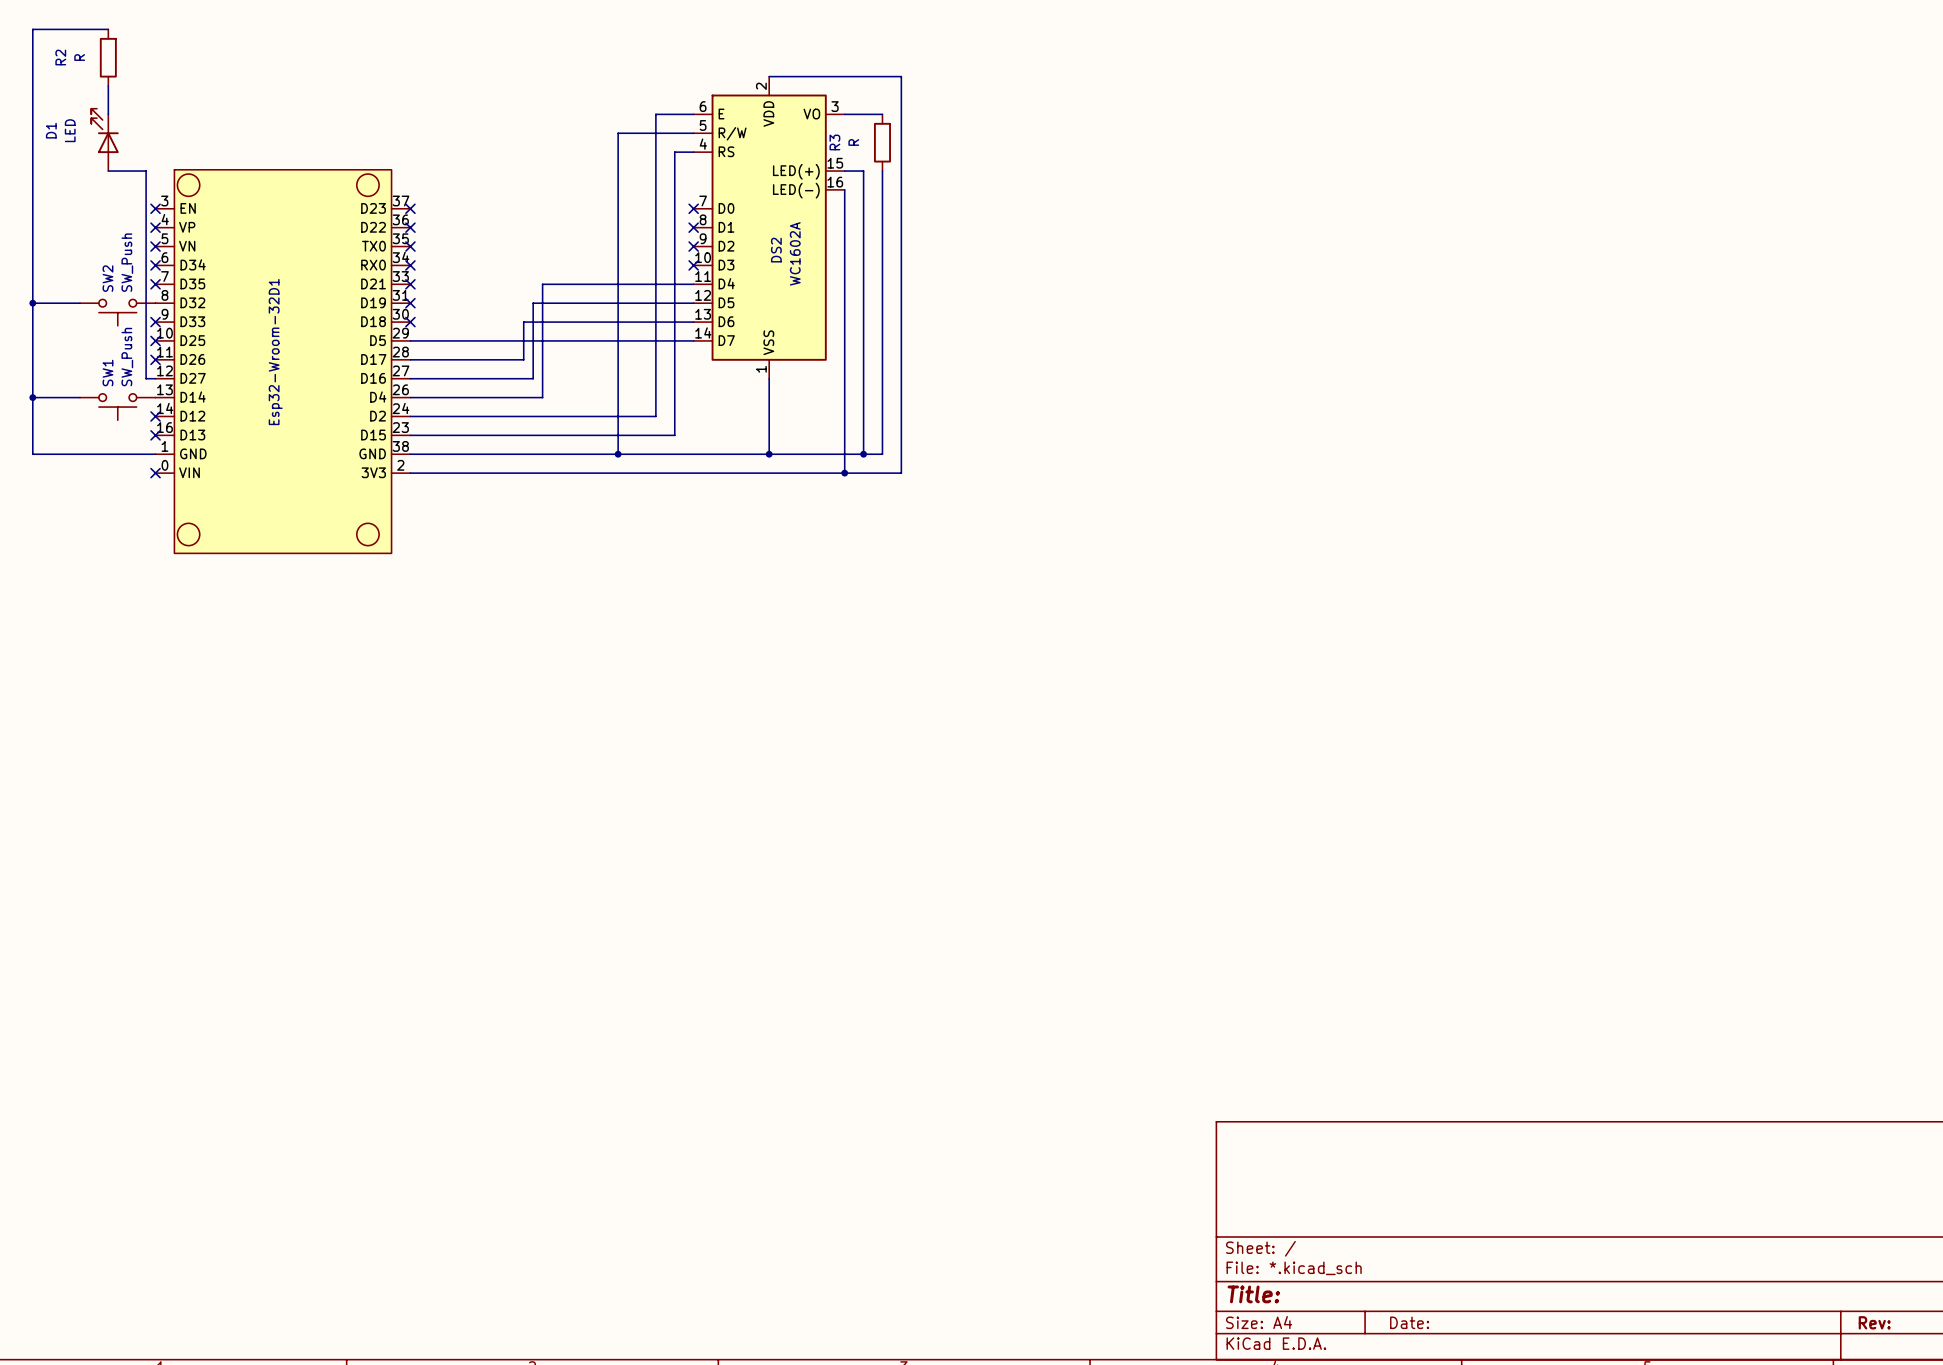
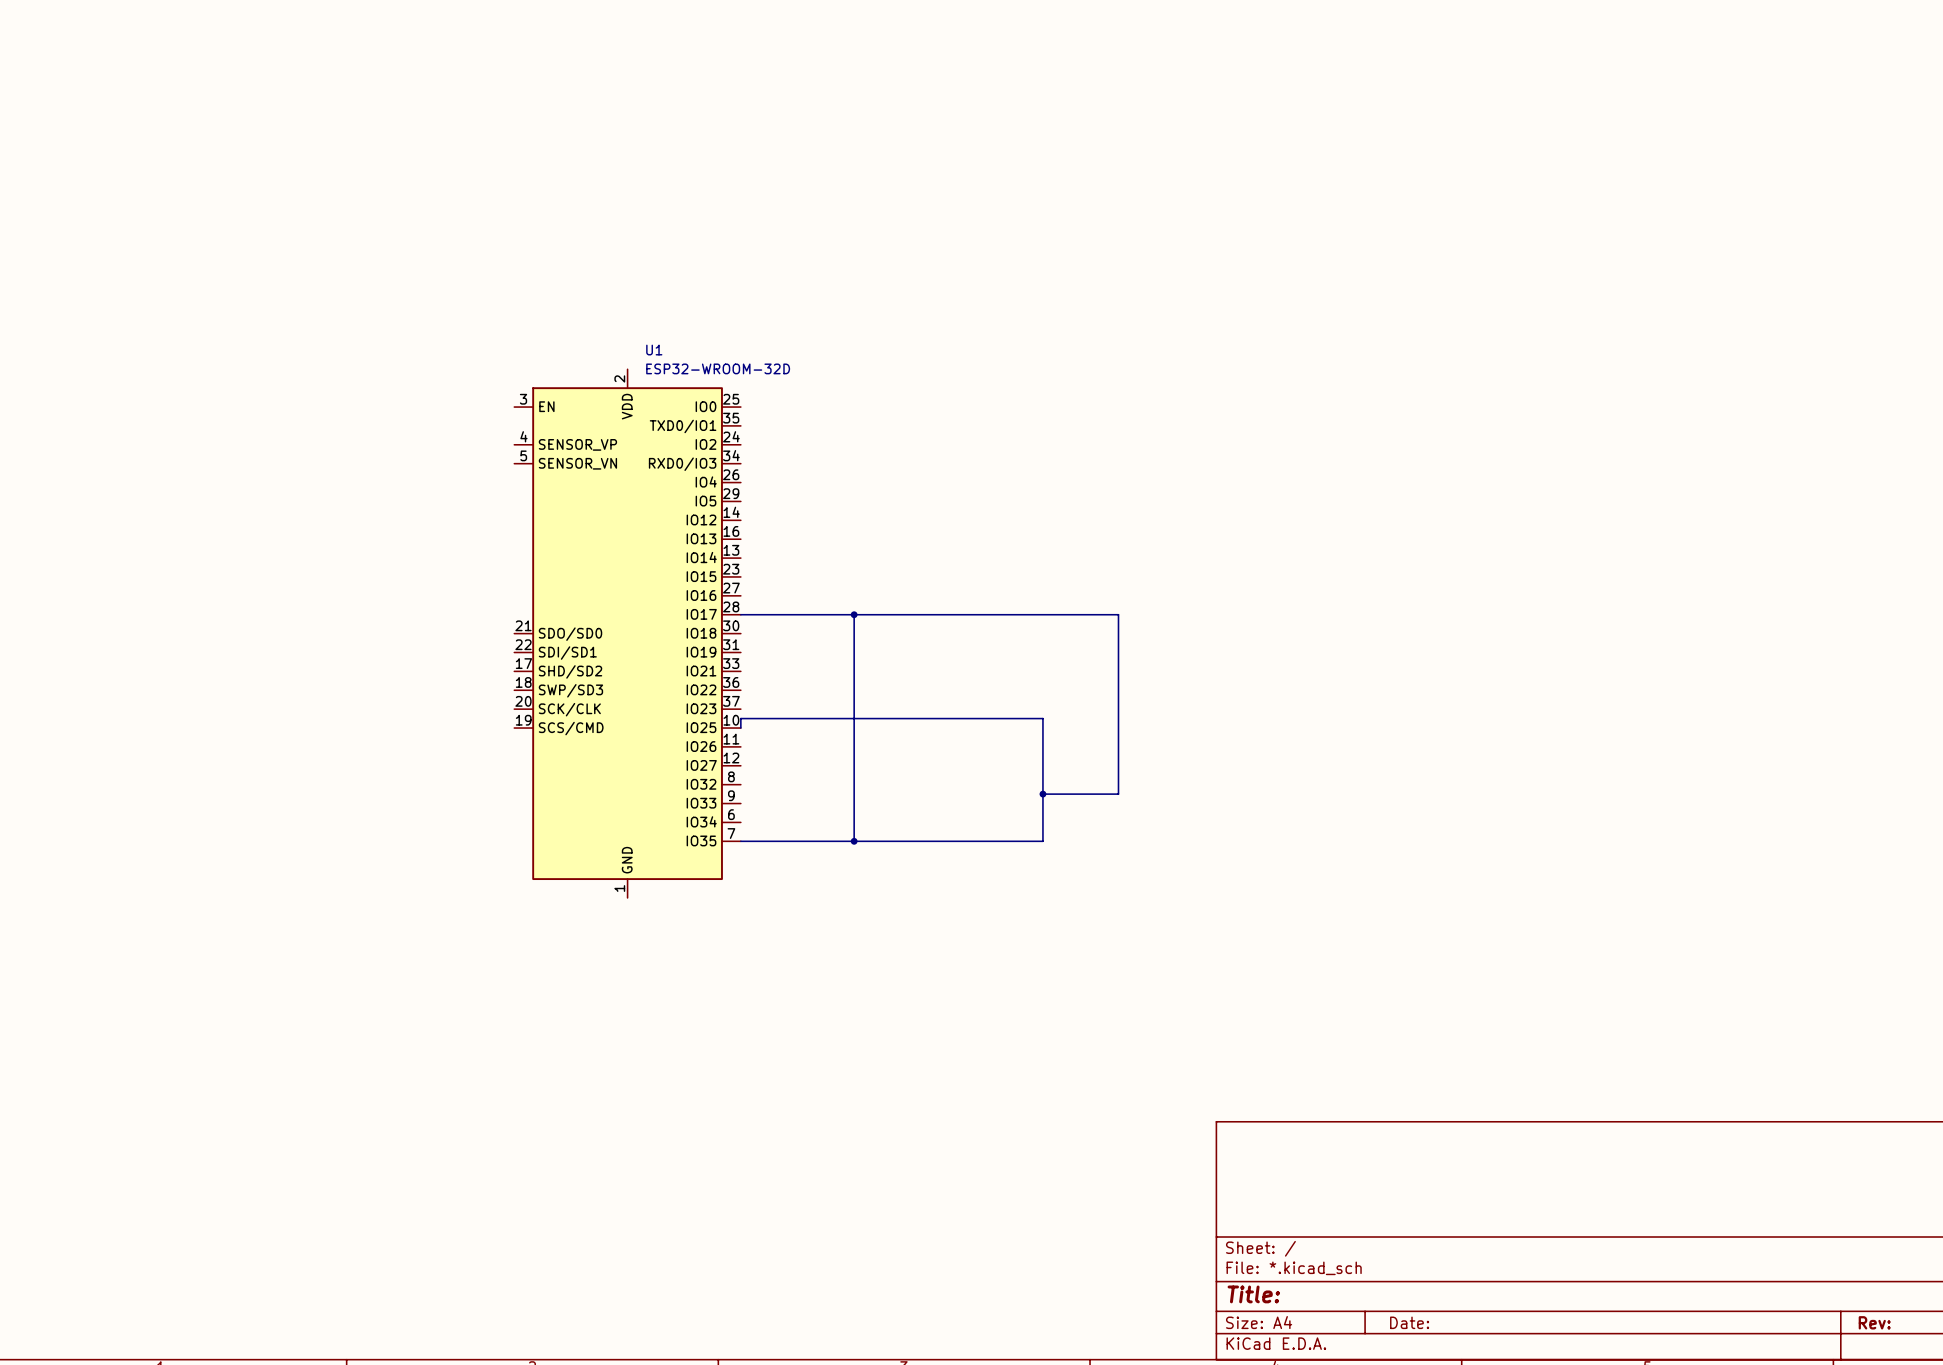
wire: (108, 29) (32, 29) (32, 454) (155, 454) -> none
R2: R (108, 57) -> none
wire: (769, 76) (901, 76) (901, 473) (410, 473) -> none
wire: (108, 86) (108, 114) -> none
wire: (693, 114) (655, 114) (655, 416) (410, 416) -> none
wire: (844, 114) (882, 114) -> none
wire: (693, 133) (618, 133) (618, 454) -> none
D1: LED (105, 139) -> none
R3: R (882, 142) -> none
wire: (693, 152) (674, 152) (674, 435) (410, 435) -> none
wire: (108, 171) (146, 171) (146, 378) (155, 378) -> none
wire: (844, 171) (863, 171) (863, 454) -> none
wire: (882, 171) (882, 454) (410, 454) -> none
wire: (844, 189) (844, 473) -> none
no-connect mark: (155, 208) -> none
no-connect mark: (410, 208) -> none
no-connect mark: (693, 208) -> none
no-connect mark: (155, 227) -> none
no-connect mark: (410, 227) -> none
no-connect mark: (693, 227) -> none
DS2: WC1602A (769, 227) -> none
no-connect mark: (155, 246) -> none
no-connect mark: (410, 246) -> none
no-connect mark: (693, 246) -> none
no-connect mark: (155, 265) -> none
no-connect mark: (410, 265) -> none
no-connect mark: (693, 265) -> none
no-connect mark: (155, 284) -> none
no-connect mark: (410, 284) -> none
wire: (693, 284) (542, 284) (542, 397) (410, 397) -> none
wire: (32, 303) (80, 303) -> none
junction: (32, 303) -> none
no-connect mark: (410, 303) -> none
wire: (693, 303) (533, 303) (533, 378) (410, 378) -> none
SW2: SW_Push (117, 312) -> none
no-connect mark: (155, 322) -> none
no-connect mark: (410, 322) -> none
wire: (693, 322) (523, 322) (523, 359) (410, 359) -> none
no-connect mark: (155, 340) -> none
wire: (410, 340) (693, 340) -> none
no-connect mark: (155, 359) -> none
Esp32-Wroom-32D1: (282, 361) -> none
wire: (769, 378) (769, 454) -> none
wire: (32, 397) (80, 397) -> none
junction: (32, 397) -> none
SW1: SW_Push (117, 407) -> none
no-connect mark: (155, 416) -> none
no-connect mark: (155, 435) -> none
junction: (618, 454) -> none
junction: (769, 454) -> none
junction: (863, 454) -> none
no-connect mark: (155, 473) -> none
junction: (844, 473) -> none
wire: none -> (740, 614) (1118, 614) (1118, 794) (1042, 794)
wire: none -> (854, 614) (854, 841)
junction: none -> (854, 614)
U1: none -> ESP32-WROOM-32D (627, 633)
wire: none -> (740, 728) (740, 718) (1042, 718) (1042, 841) (740, 841)
junction: none -> (1042, 794)
junction: none -> (854, 841)

